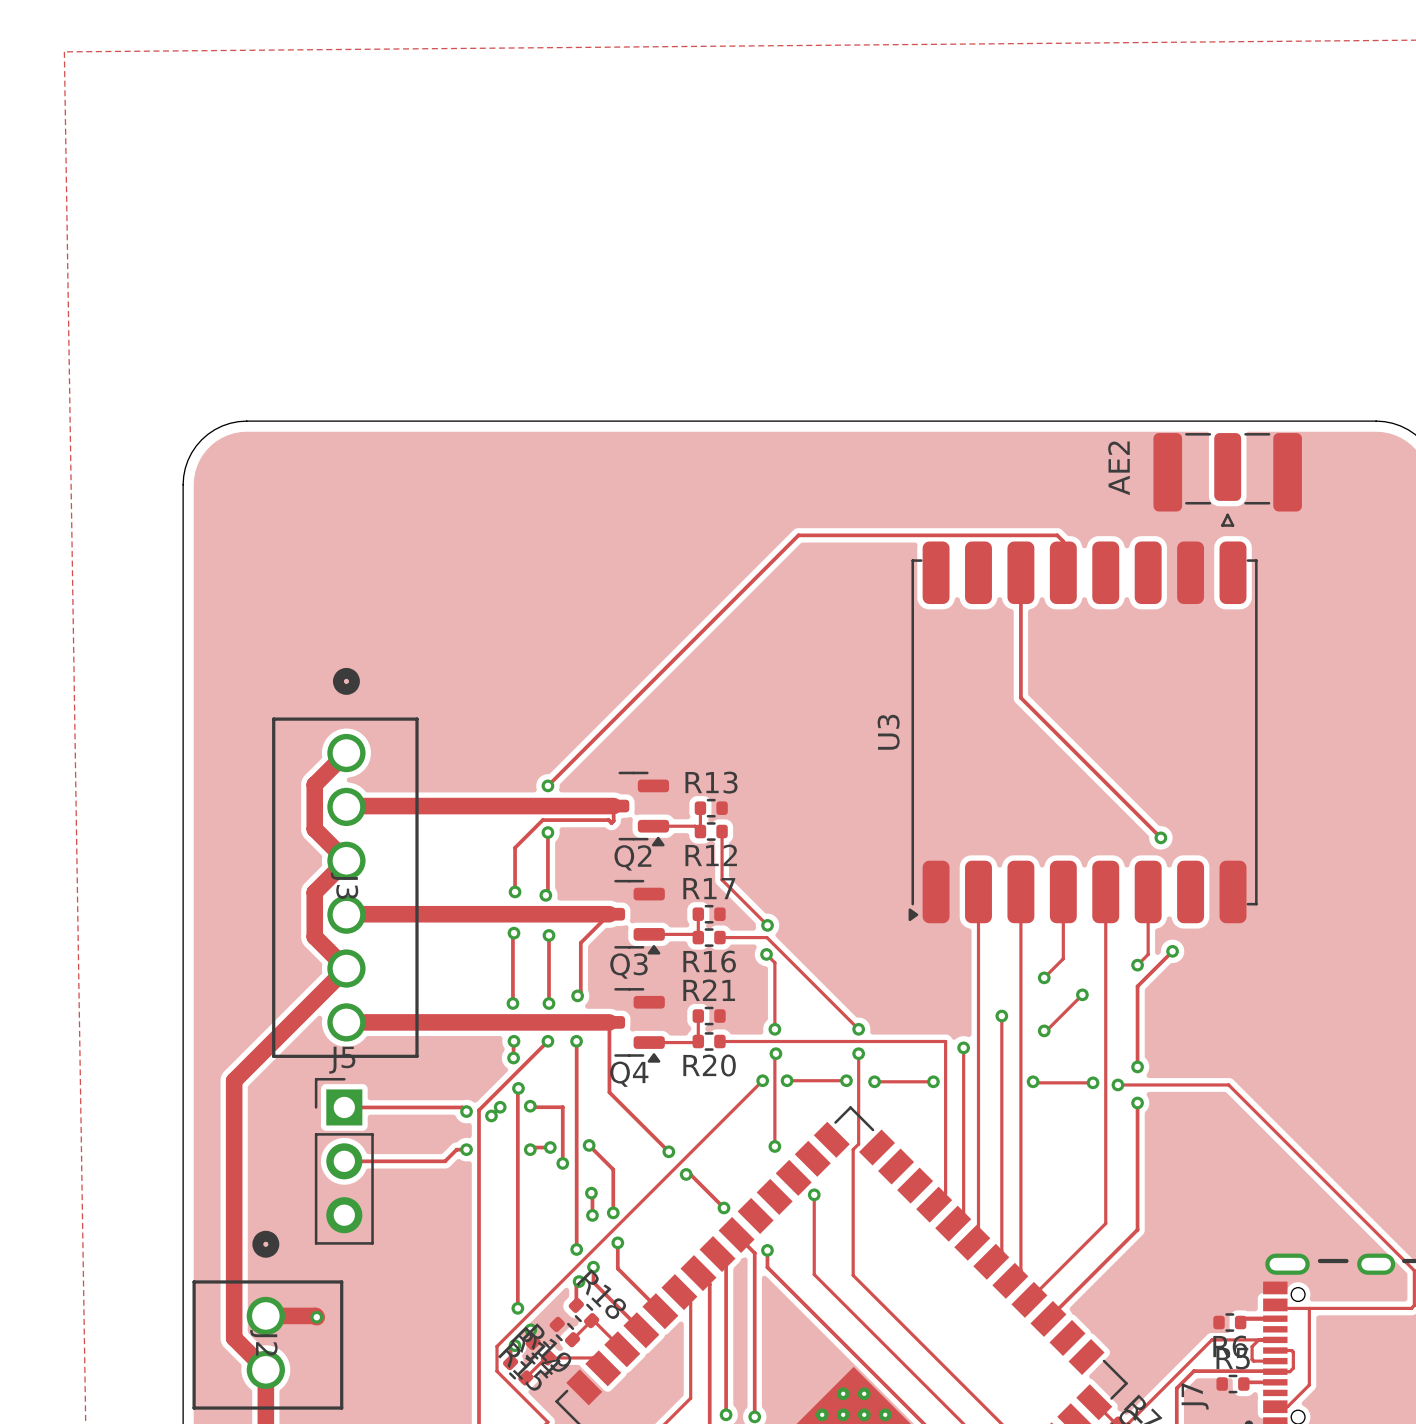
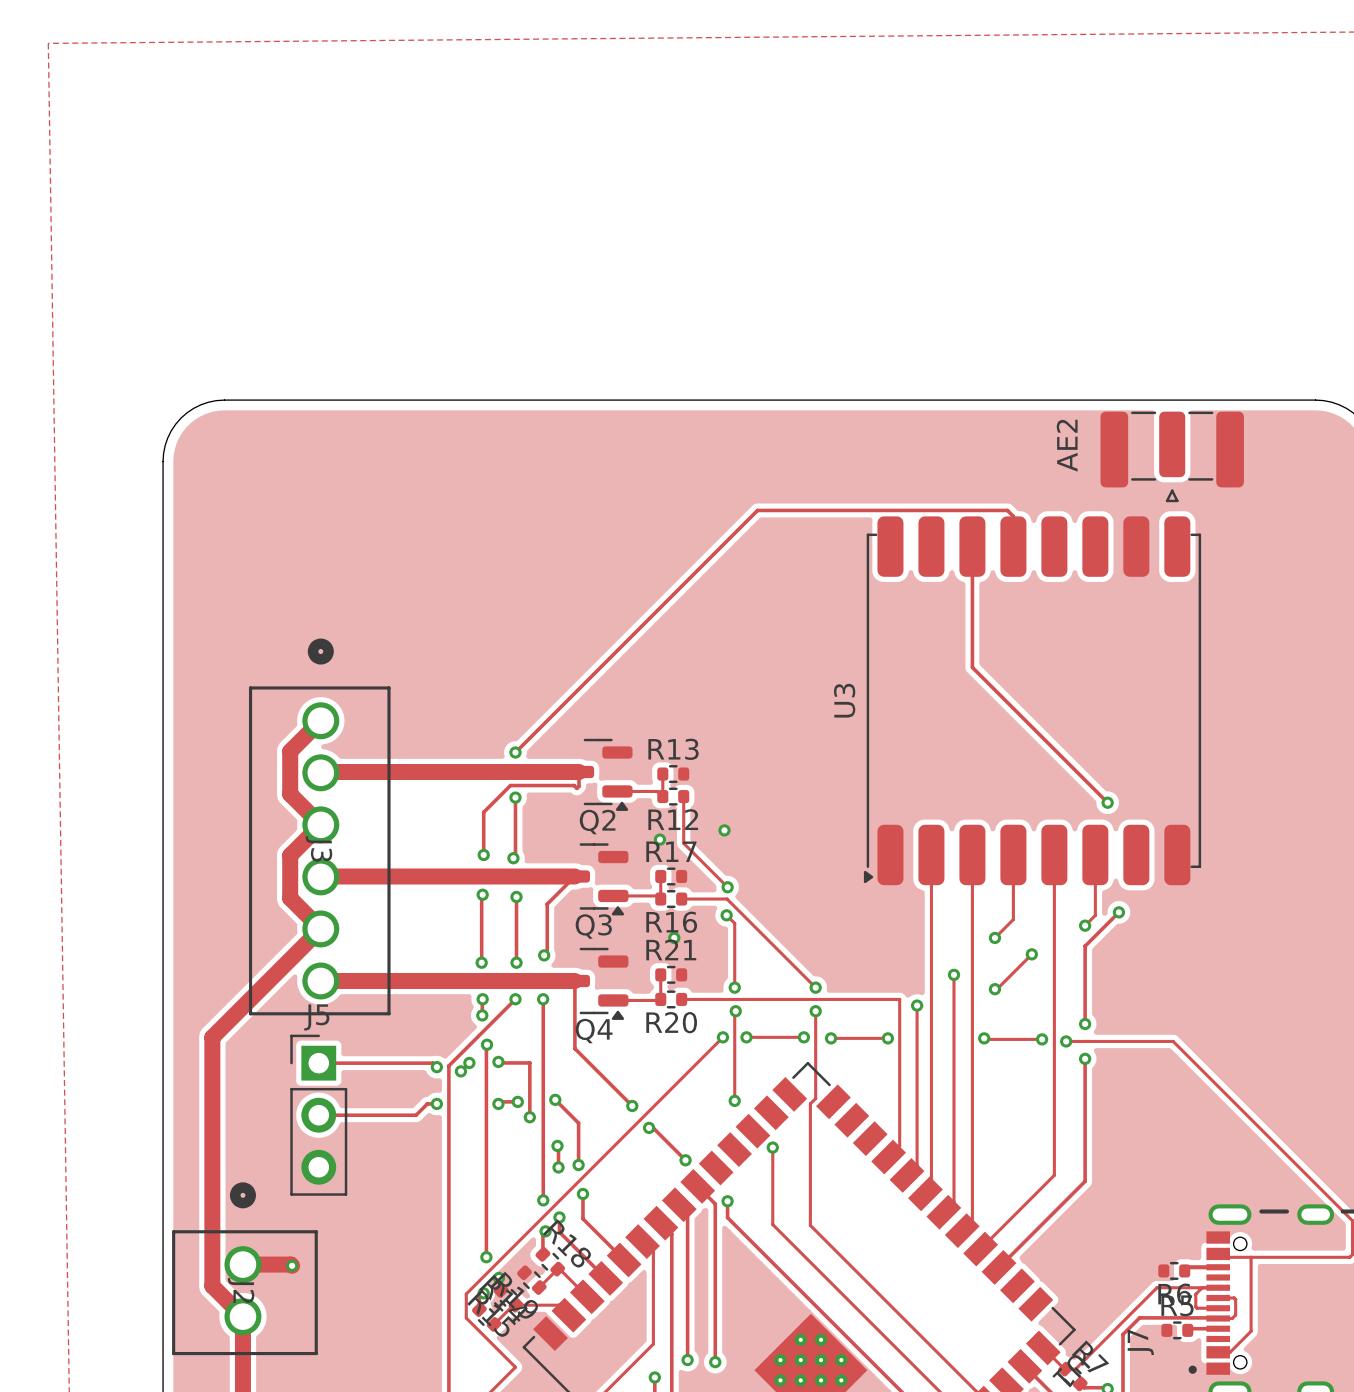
via: none -> (724, 830)
via: none -> (659, 839)
via: none -> (674, 937)

